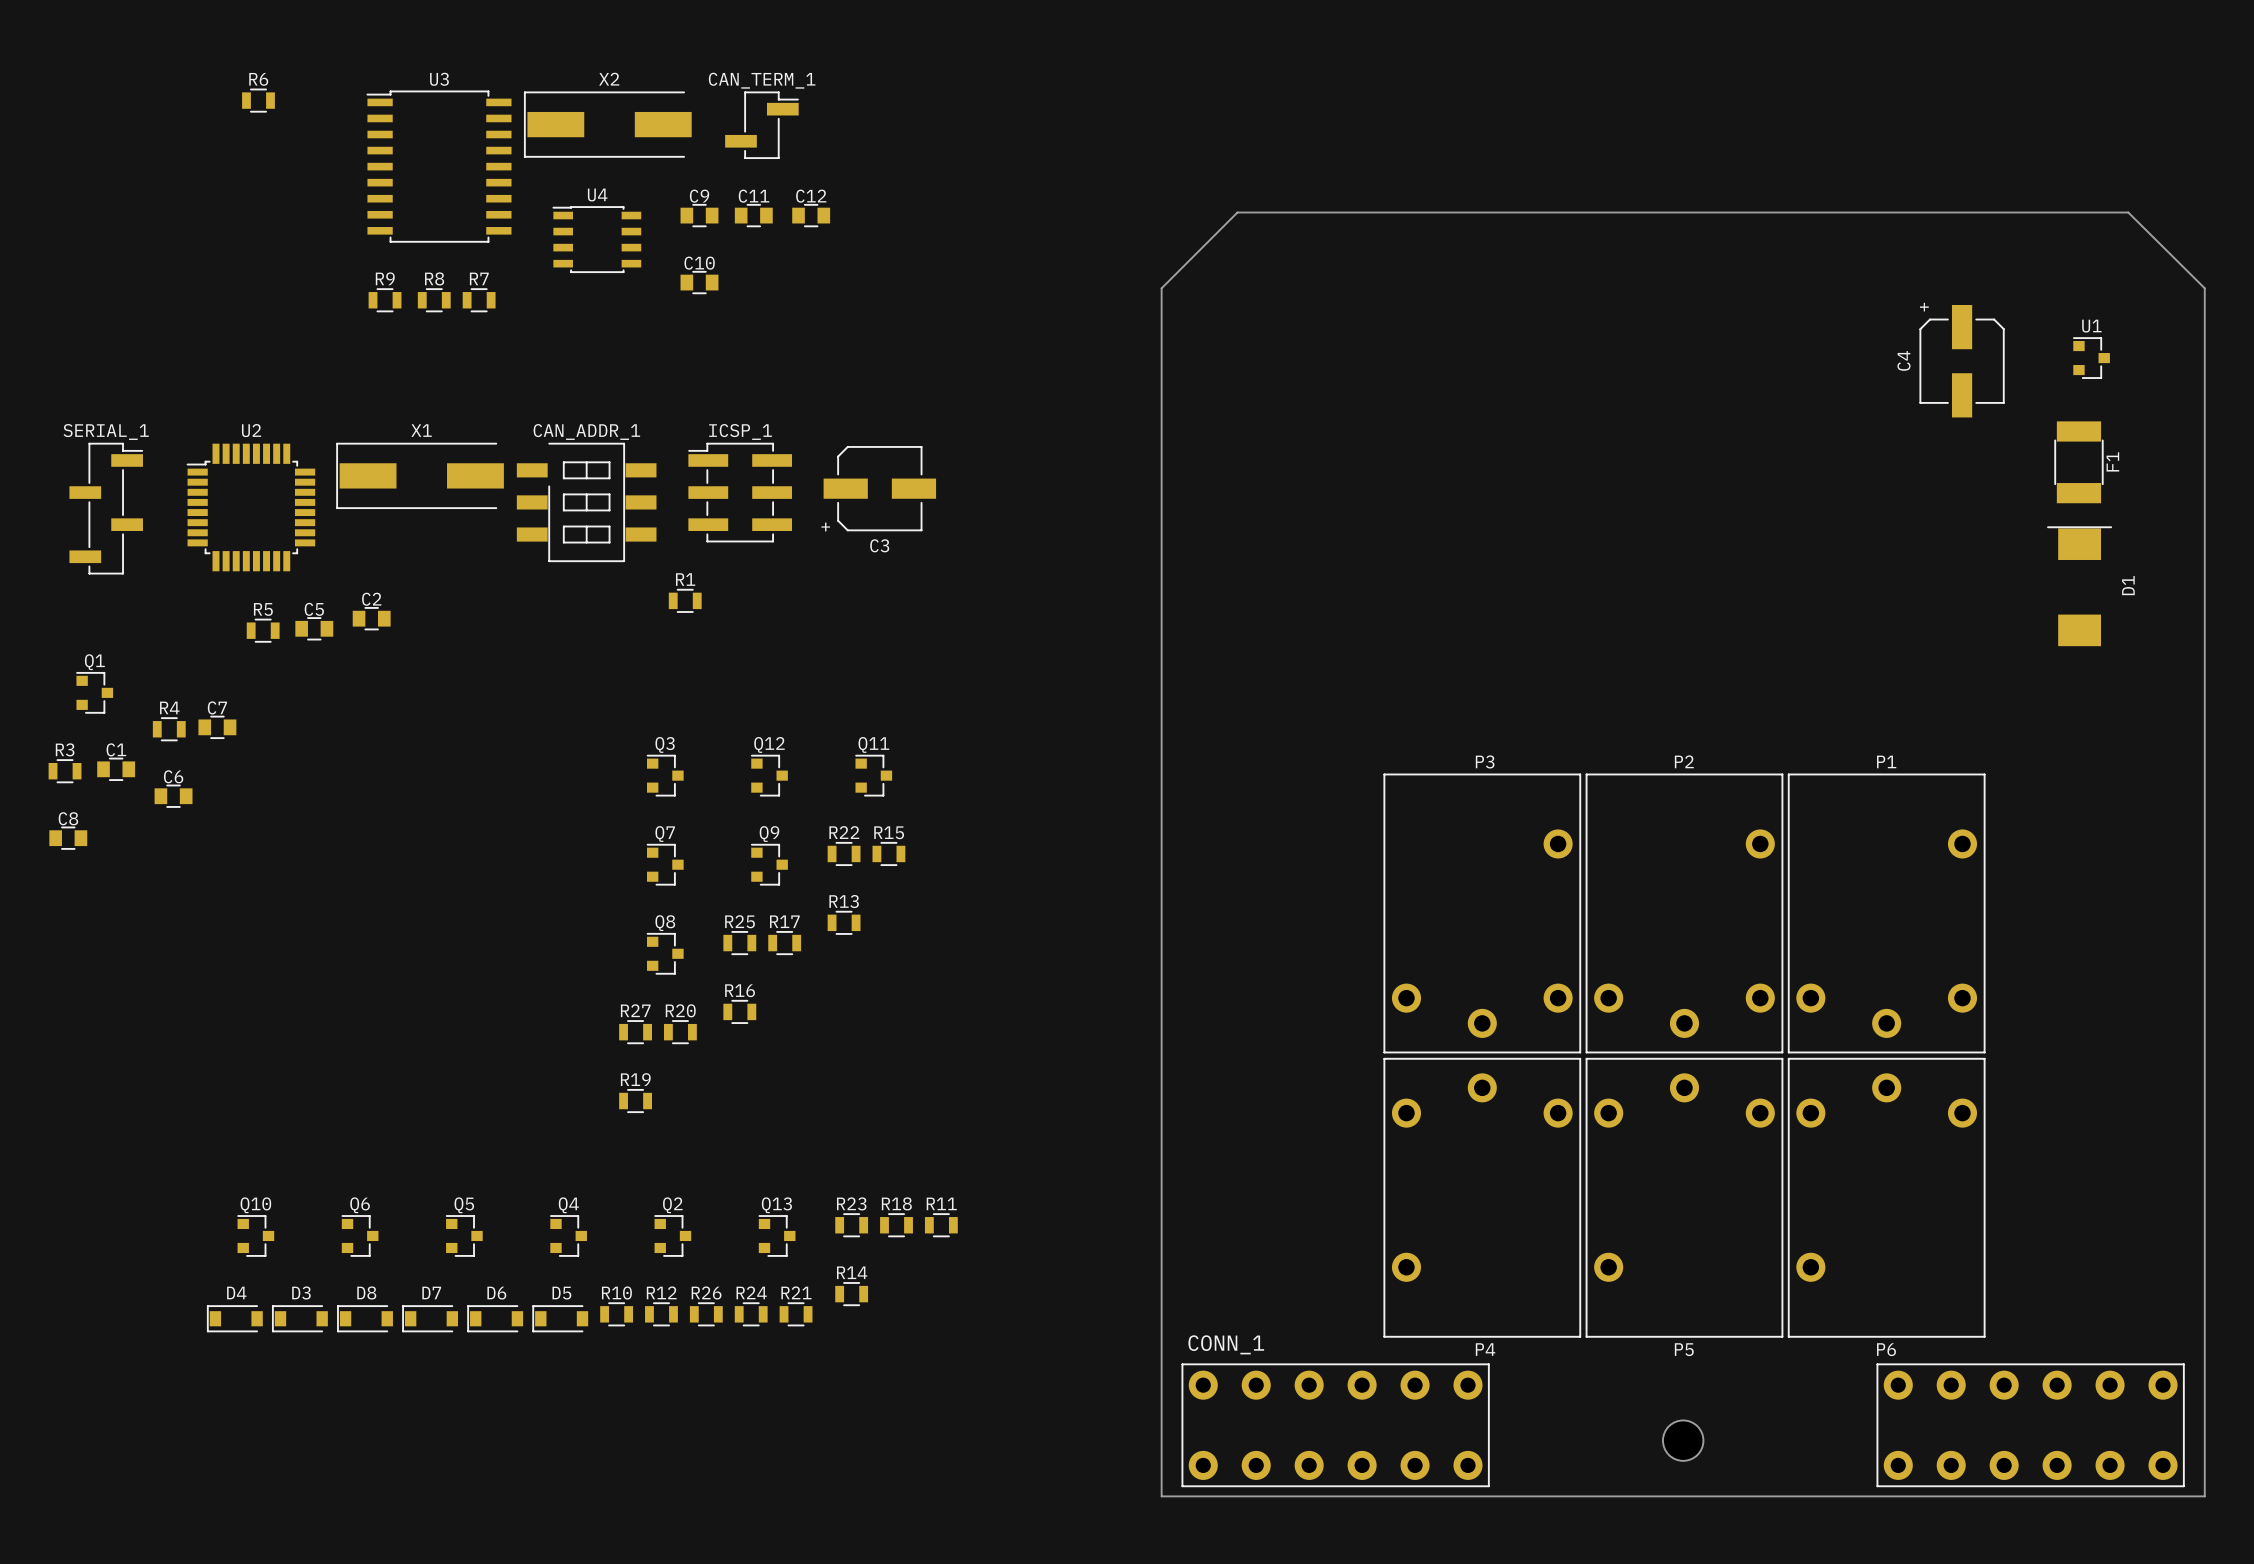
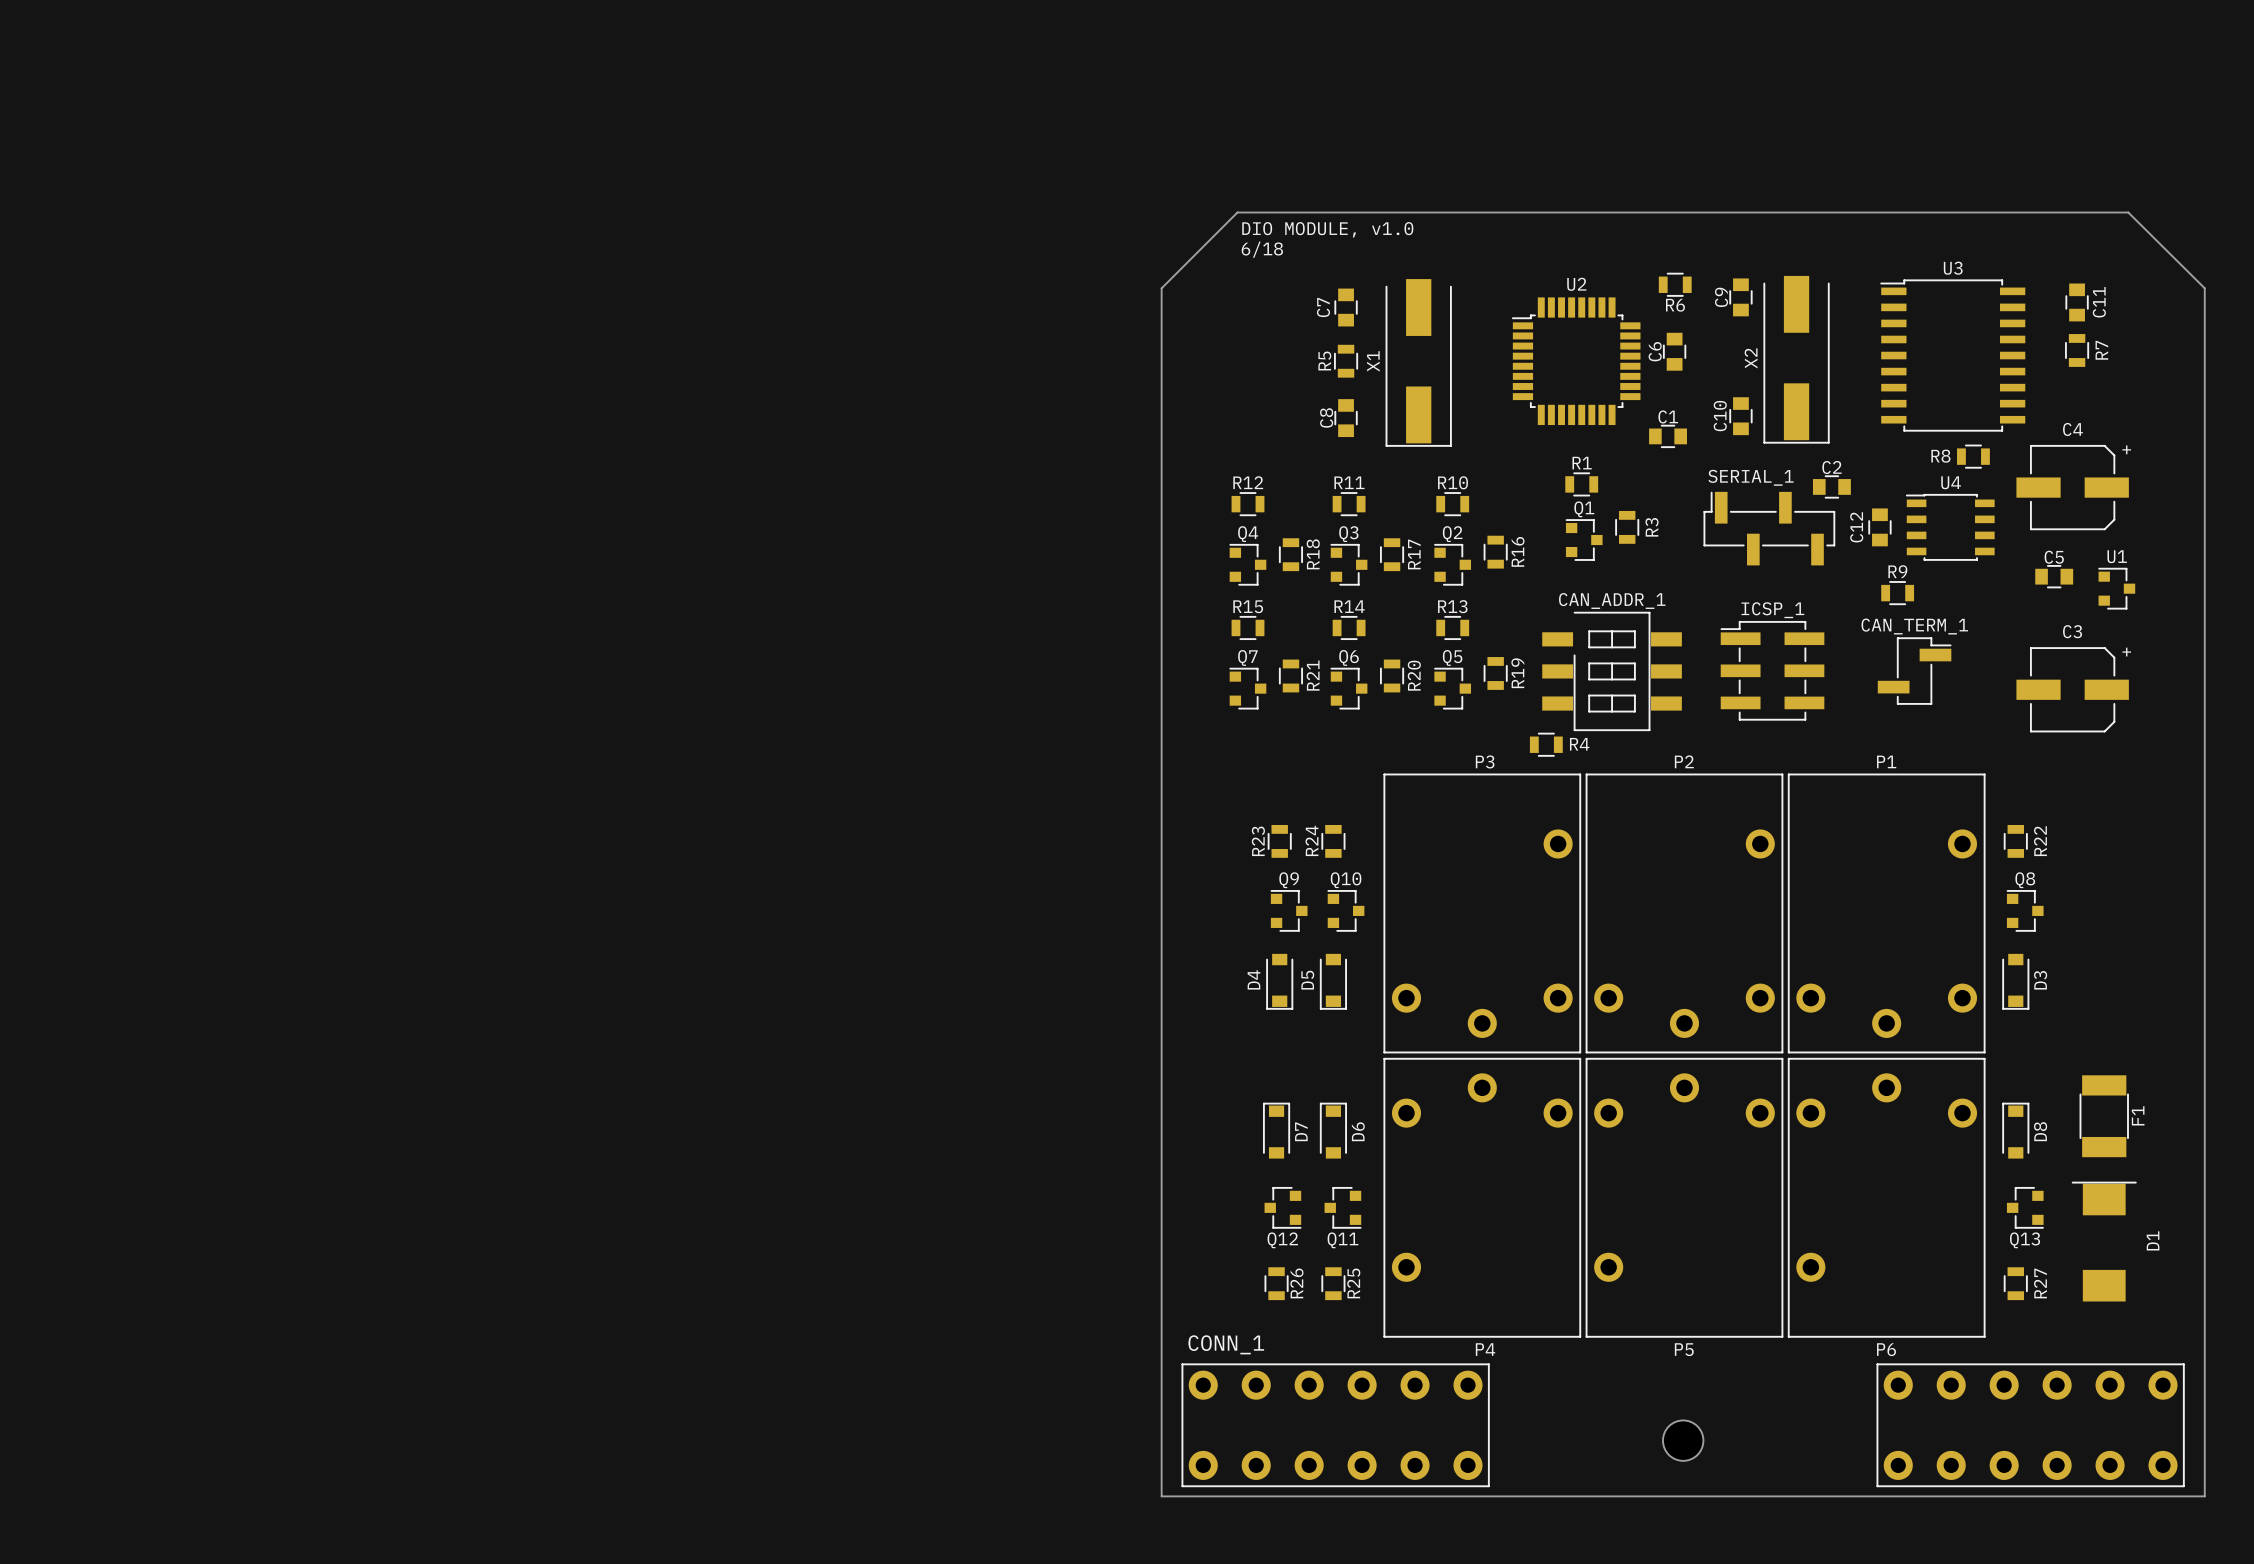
R6 name position: R6 (258, 79) -> R6 (1675, 305)
R6 position: (258, 100) -> (1675, 284)
X2 rotation: 0° (607, 124) -> 90° counterclockwise (1796, 359)
X2 position: (607, 124) -> (1796, 359)
CAN_TERM_1 position: (761, 125) -> (1914, 671)
U3 position: (439, 166) -> (1952, 355)
C9 name position: C9 (699, 196) -> C9 (1721, 297)
C12 name position: C12 (811, 196) -> C12 (1856, 527)
C9 rotation: 0° (699, 215) -> 90° clockwise (1740, 297)
C9 position: (699, 215) -> (1740, 297)
C11 rotation: 0° (753, 215) -> 90° clockwise (2077, 302)
C11 position: (753, 215) -> (2077, 302)
C12 rotation: 0° (811, 215) -> 90° clockwise (1879, 527)
C12 position: (811, 215) -> (1879, 527)
text: none -> DIO MODULE, v1.0 (1327, 229)
U4 position: (596, 239) -> (1950, 527)
text: none -> 6/18 (1262, 249)
C10 name position: C10 (699, 263) -> C10 (1720, 416)
R8 name position: R8 (434, 278) -> R8 (1940, 456)
C10 rotation: 0° (699, 282) -> 90° clockwise (1740, 416)
C10 position: (699, 282) -> (1740, 416)
R9 position: (385, 300) -> (1897, 593)
R8 position: (434, 300) -> (1973, 456)
R7 rotation: 0° (479, 300) -> 90° clockwise (2077, 350)
R7 position: (479, 300) -> (2077, 350)
U1 position: (2091, 358) -> (2116, 588)
C4 rotation: 0° (1962, 361) -> 90° clockwise (2072, 487)
C4 position: (1962, 361) -> (2072, 487)
SERIAL_1 name position: SERIAL_1 (106, 431) -> SERIAL_1 (1751, 477)
F1 position: (2078, 462) -> (2104, 1116)
X1 rotation: 0° (420, 475) -> 90° counterclockwise (1418, 362)
X1 position: (420, 475) -> (1418, 362)
C3 rotation: 0° (879, 488) -> 180° (2072, 689)
C3 position: (879, 488) -> (2072, 689)
ICSP_1 position: (740, 492) -> (1772, 670)
CAN_ADDR_1 position: (586, 502) -> (1612, 671)
U2 position: (250, 507) -> (1576, 361)
SERIAL_1 rotation: 0° (106, 508) -> 90° counterclockwise (1769, 528)
SERIAL_1 position: (106, 508) -> (1769, 528)
D1 position: (2079, 586) -> (2104, 1241)
R1 position: (685, 600) -> (1581, 484)
R5 name position: R5 (263, 609) -> R5 (1324, 361)
C2 position: (371, 618) -> (1831, 486)
C5 position: (314, 628) -> (2054, 576)
R5 rotation: 0° (263, 630) -> 90° clockwise (1346, 361)
R5 position: (263, 630) -> (1346, 361)
Q1 position: (94, 692) -> (1584, 540)
R4 name position: R4 (169, 707) -> R4 (1579, 744)
C7 name position: C7 (217, 707) -> C7 (1323, 307)
C7 rotation: 0° (217, 727) -> 90° clockwise (1346, 307)
C7 position: (217, 727) -> (1346, 307)
R4 position: (169, 729) -> (1546, 744)
C1 position: (116, 769) -> (1668, 436)
R3 rotation: 0° (65, 771) -> 90° clockwise (1627, 527)
R3 position: (65, 771) -> (1627, 527)
Q3 position: (665, 775) -> (1349, 564)
Q12 rotation: 0° (769, 775) -> 180° (1282, 1207)
Q12 position: (769, 775) -> (1282, 1207)
Q11 rotation: 0° (873, 775) -> 180° (1342, 1207)
Q11 position: (873, 775) -> (1342, 1207)
C6 name position: C6 (173, 776) -> C6 (1655, 351)
C6 rotation: 0° (173, 796) -> 90° clockwise (1674, 351)
C6 position: (173, 796) -> (1674, 351)
C8 name position: C8 (68, 818) -> C8 (1326, 417)
C8 rotation: 0° (68, 838) -> 90° clockwise (1346, 418)
C8 position: (68, 838) -> (1346, 418)
R22 rotation: 0° (844, 853) -> 90° clockwise (2015, 841)
R22 position: (844, 853) -> (2015, 841)
R15 position: (888, 853) -> (1247, 627)
Q7 position: (665, 864) -> (1247, 688)
Q9 position: (769, 864) -> (1289, 910)
R13 position: (844, 922) -> (1452, 627)
R25 rotation: 0° (739, 943) -> 90° clockwise (1333, 1283)
R25 position: (739, 943) -> (1333, 1283)
R17 rotation: 0° (784, 943) -> 90° clockwise (1392, 554)
R17 position: (784, 943) -> (1392, 554)
Q8 position: (665, 953) -> (2025, 910)
R16 rotation: 0° (739, 1011) -> 90° clockwise (1495, 552)
R16 position: (739, 1011) -> (1495, 552)
R27 rotation: 0° (635, 1032) -> 90° clockwise (2015, 1283)
R27 position: (635, 1032) -> (2015, 1283)
R20 rotation: 0° (680, 1032) -> 90° clockwise (1392, 675)
R20 position: (680, 1032) -> (1392, 675)
R19 rotation: 0° (635, 1101) -> 90° clockwise (1495, 673)
R19 position: (635, 1101) -> (1495, 673)
R23 name position: R23 (851, 1203) -> R23 (1258, 841)
R23 rotation: 0° (851, 1225) -> 90° clockwise (1279, 841)
R23 position: (851, 1225) -> (1279, 841)
R18 rotation: 0° (896, 1225) -> 90° clockwise (1290, 554)
R18 position: (896, 1225) -> (1290, 554)
R11 position: (941, 1225) -> (1349, 504)
Q10 position: (255, 1235) -> (1345, 910)
Q6 position: (360, 1235) -> (1349, 688)
Q5 position: (464, 1235) -> (1452, 688)
Q4 position: (568, 1235) -> (1247, 564)
Q2 position: (672, 1235) -> (1452, 564)
Q13 rotation: 0° (777, 1235) -> 180° (2025, 1207)
Q13 position: (777, 1235) -> (2025, 1207)
R24 name position: R24 (751, 1292) -> R24 (1311, 840)
D3 name position: D3 (301, 1293) -> D3 (2040, 980)
R14 position: (851, 1294) -> (1349, 627)
R10 position: (616, 1314) -> (1452, 504)
R12 position: (661, 1314) -> (1247, 504)
R26 rotation: 0° (706, 1314) -> 90° clockwise (1276, 1283)
R26 position: (706, 1314) -> (1276, 1283)
R24 rotation: 0° (751, 1314) -> 90° clockwise (1333, 841)
R24 position: (751, 1314) -> (1333, 841)
R21 rotation: 0° (796, 1314) -> 90° clockwise (1290, 675)
R21 position: (796, 1314) -> (1290, 675)
D4 rotation: 0° (234, 1318) -> 90° counterclockwise (1279, 981)
D4 position: (234, 1318) -> (1279, 981)
D3 rotation: 0° (300, 1318) -> 90° counterclockwise (2015, 981)
D3 position: (300, 1318) -> (2015, 981)
D8 rotation: 0° (365, 1318) -> 90° clockwise (2015, 1130)
D8 position: (365, 1318) -> (2015, 1130)
D7 rotation: 0° (430, 1318) -> 90° clockwise (1276, 1130)
D7 position: (430, 1318) -> (1276, 1130)
D6 rotation: 0° (495, 1318) -> 90° clockwise (1333, 1130)
D6 position: (495, 1318) -> (1333, 1130)
D5 rotation: 0° (560, 1318) -> 90° counterclockwise (1333, 981)
D5 position: (560, 1318) -> (1333, 981)

